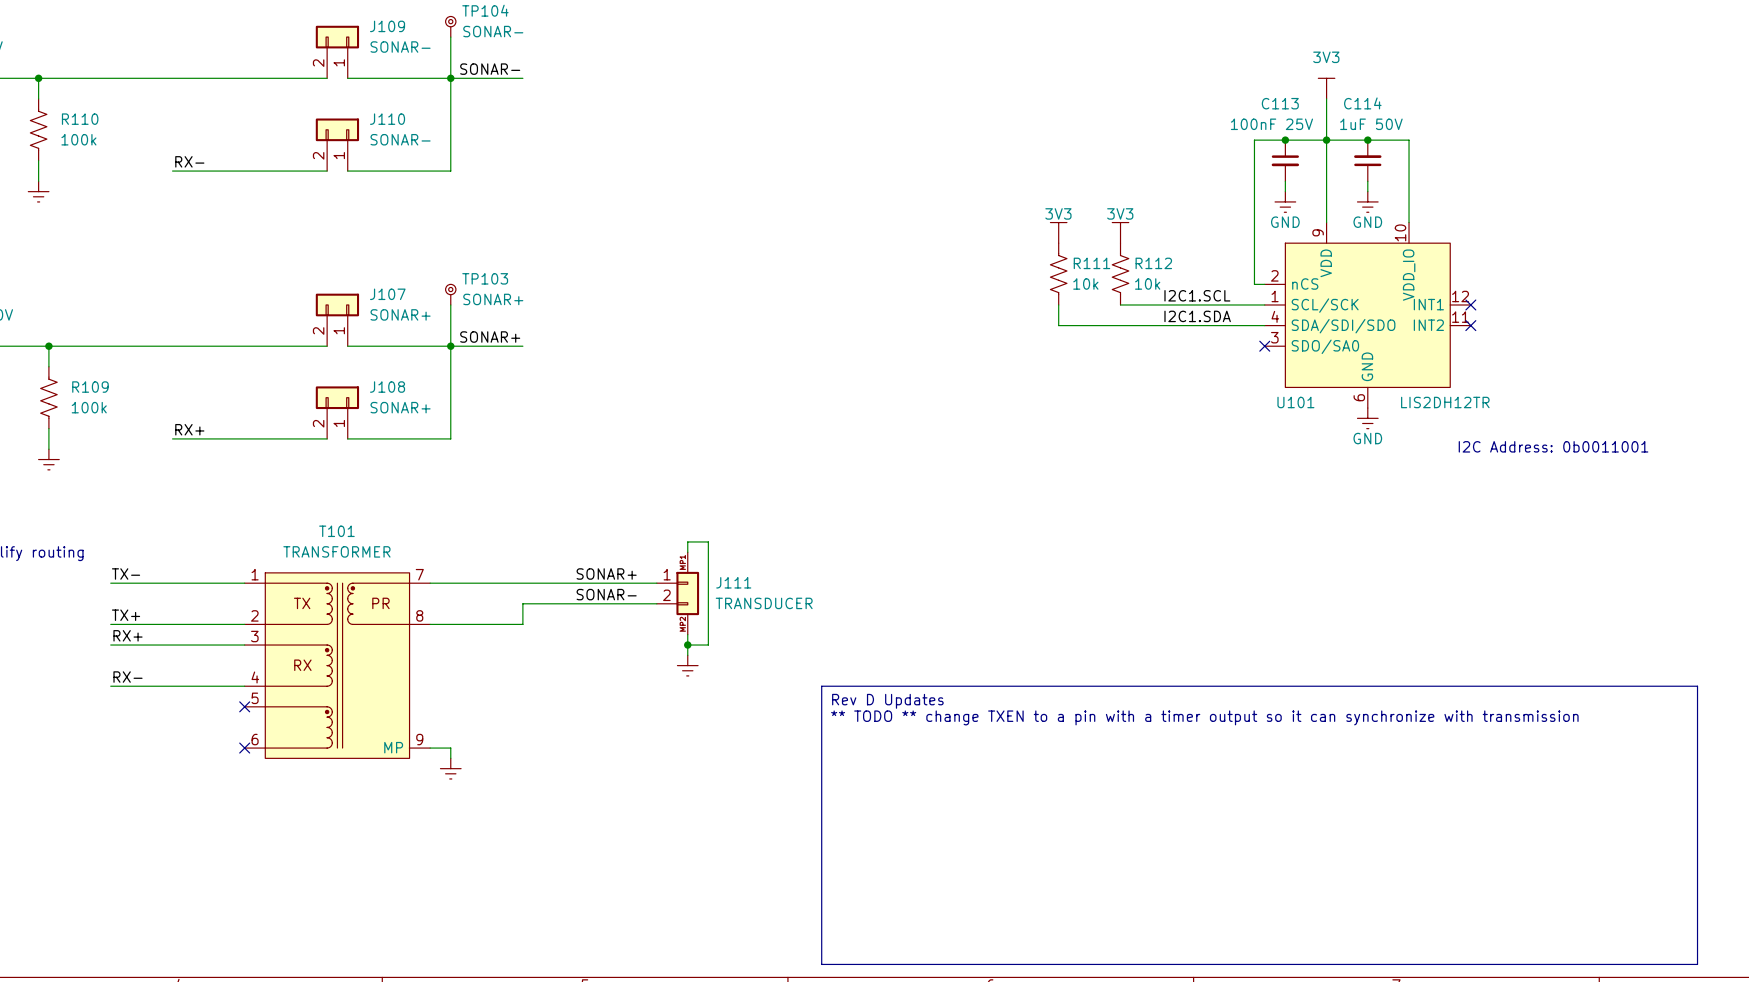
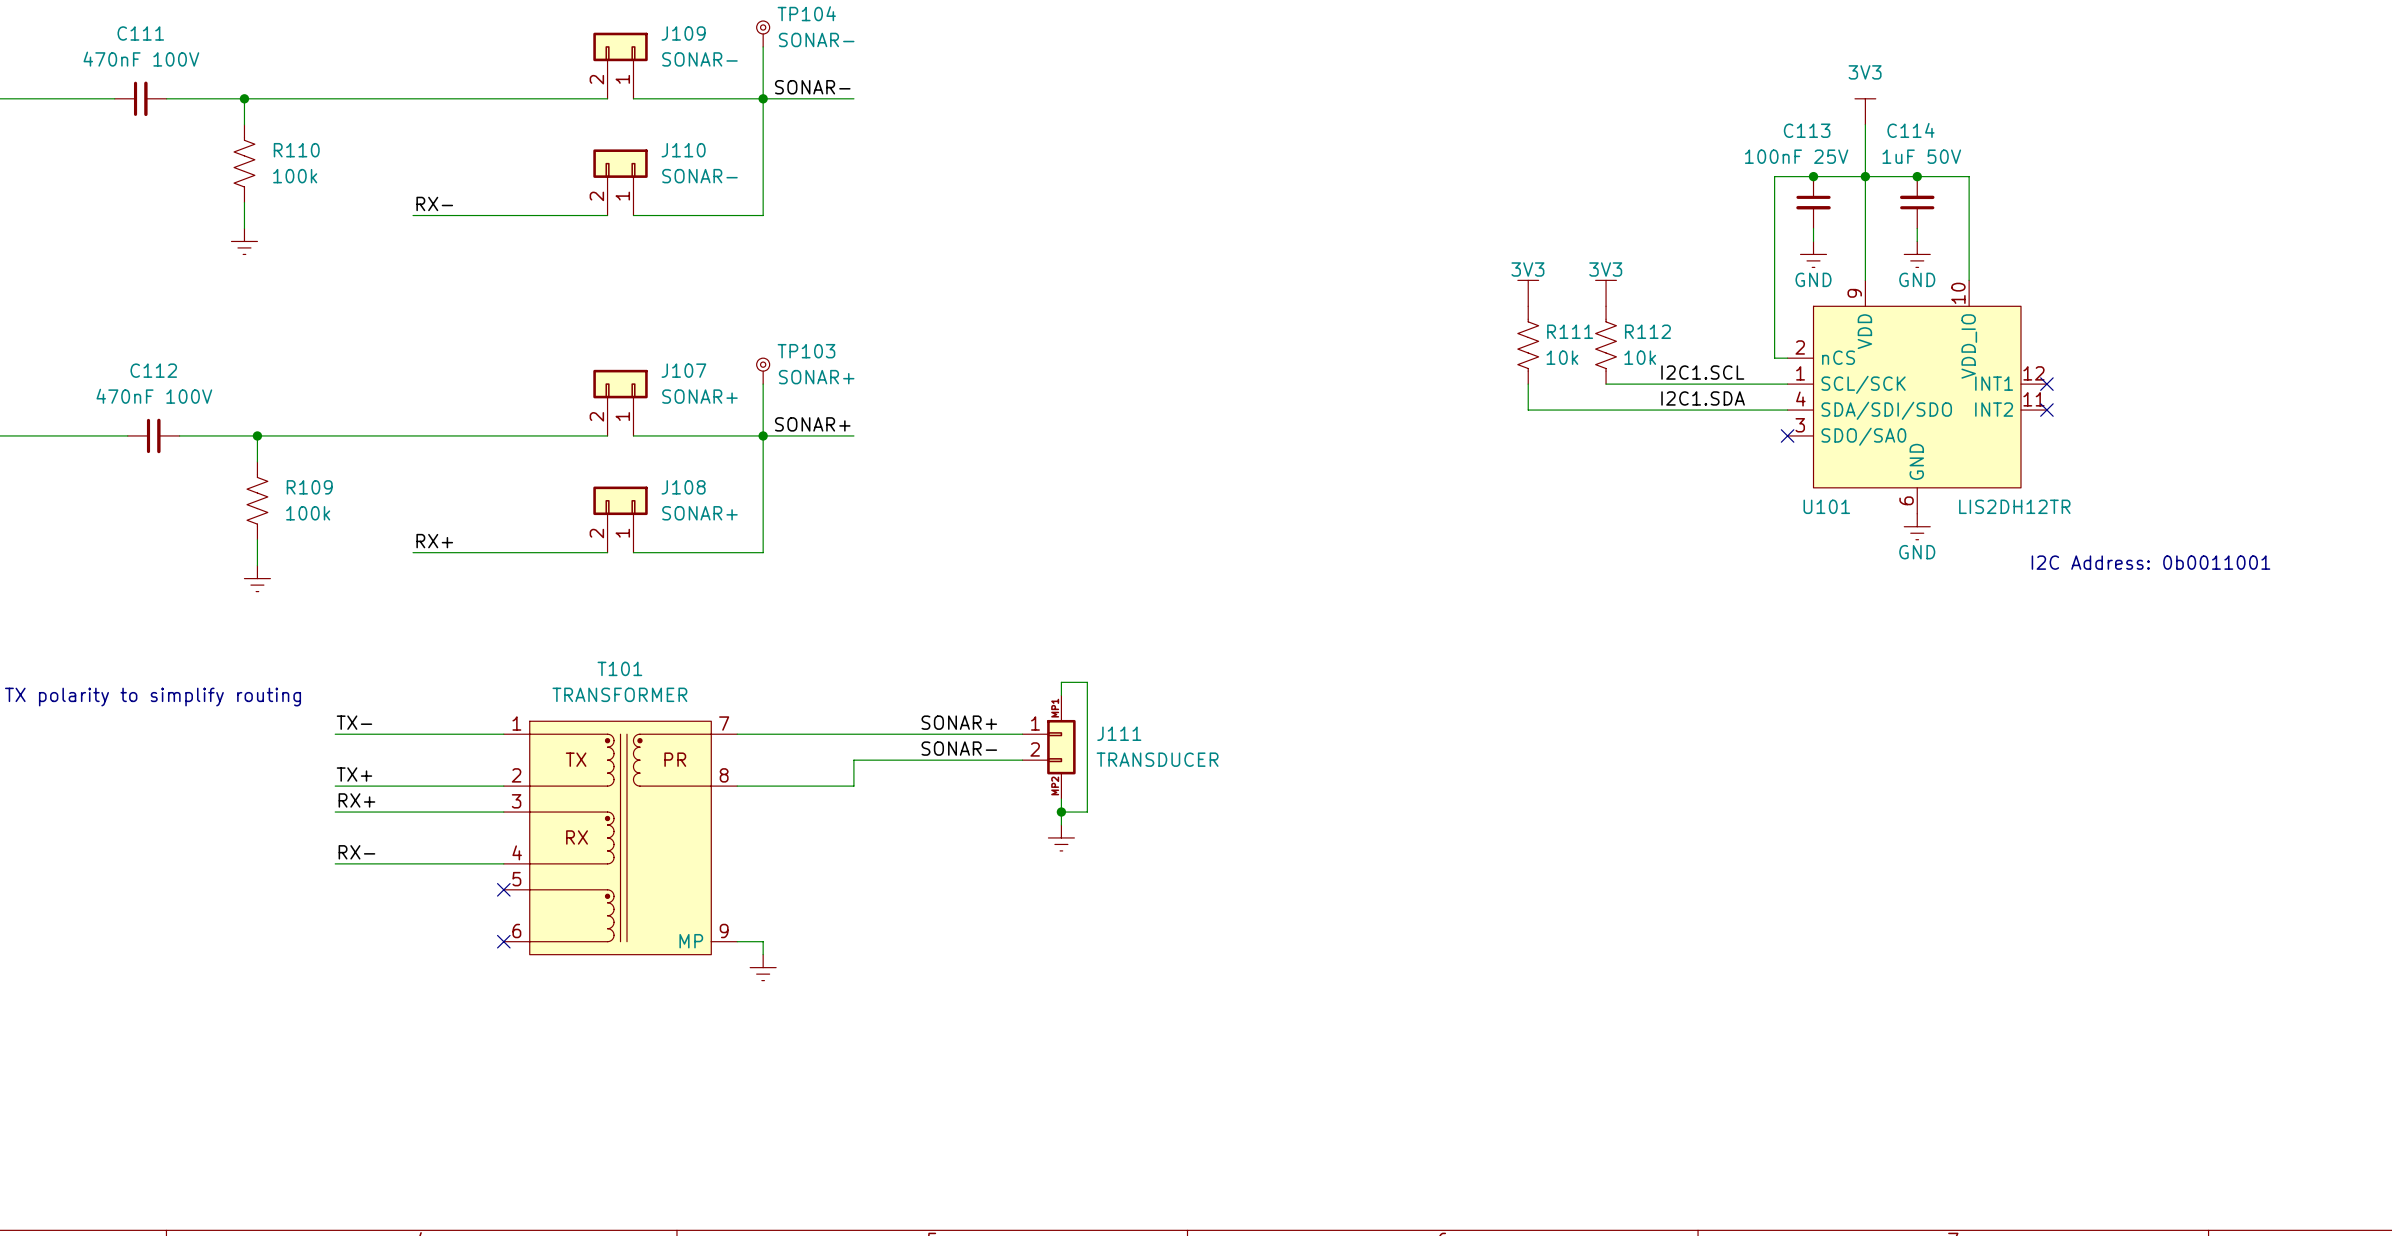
line: (821, 686) (1697, 686) (1697, 964) (821, 964) (821, 686) -> none
text: Rev D Updates (887, 701) -> none
text: ** TODO ** change TXEN to a pin with a timer output so it can synchronize with transmission (1204, 717) -> none

